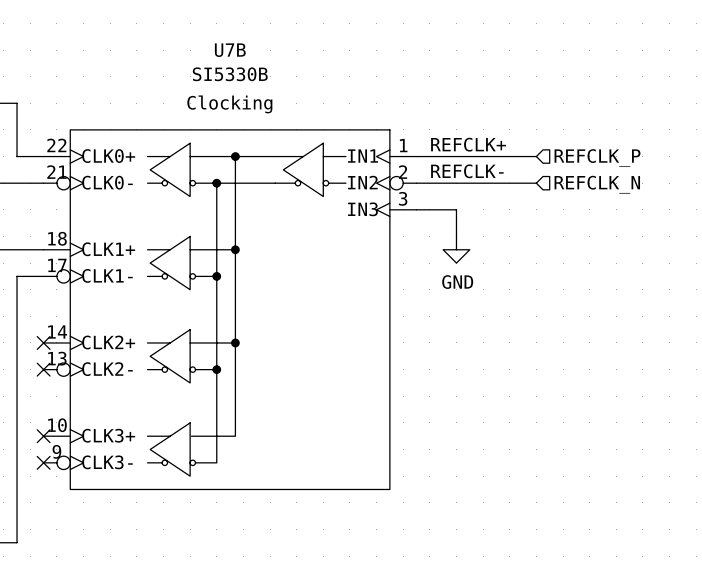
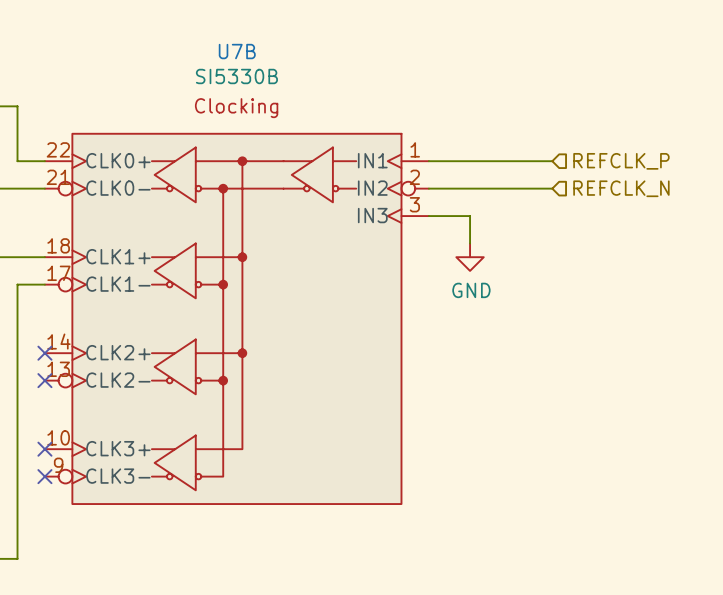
label: REFCLK+ (468, 144) -> none
label: REFCLK- (467, 171) -> none

